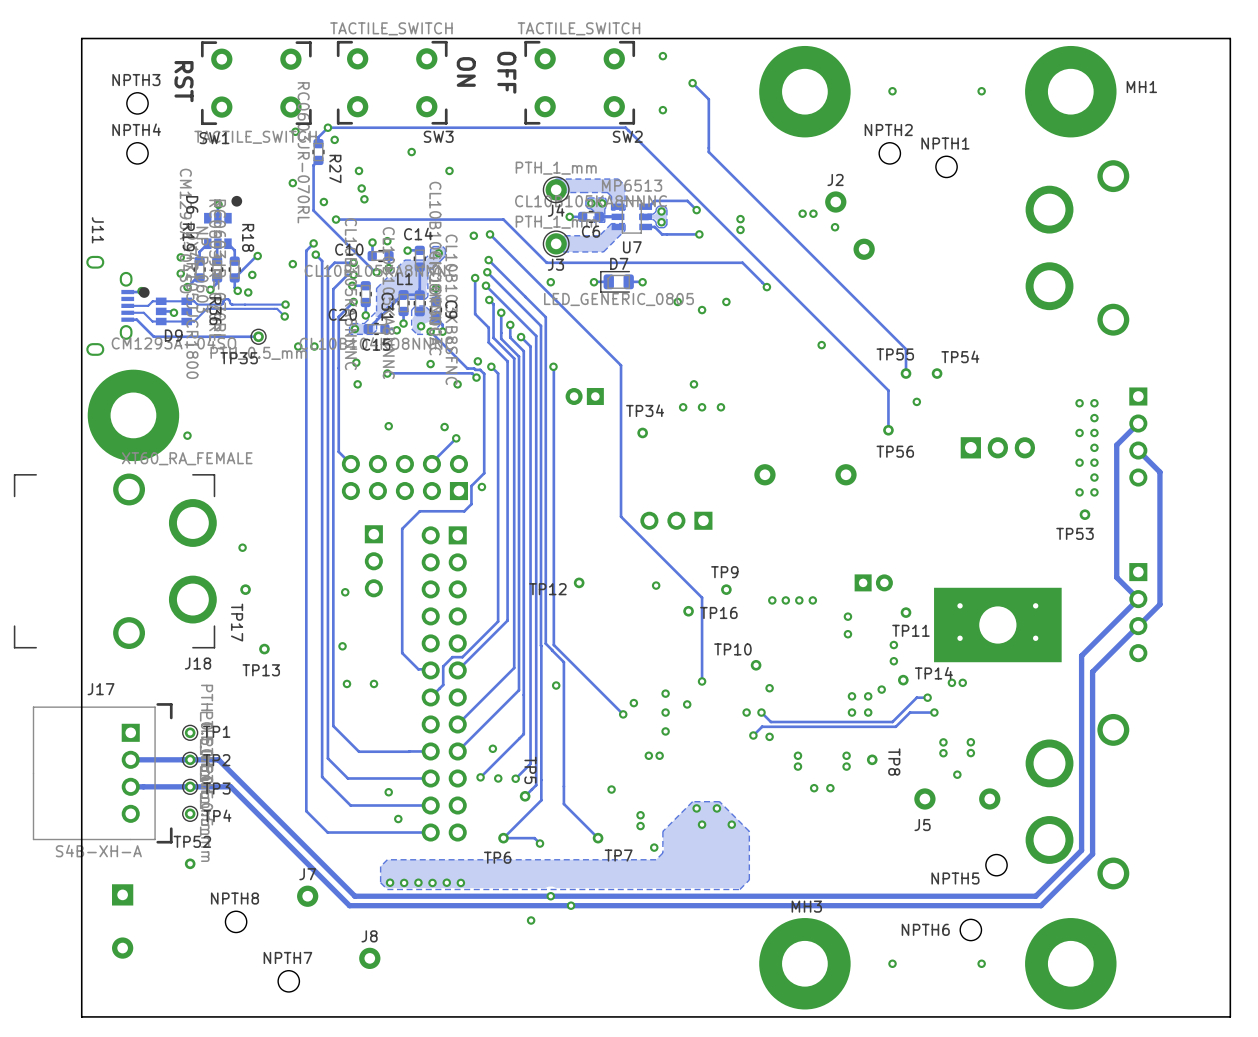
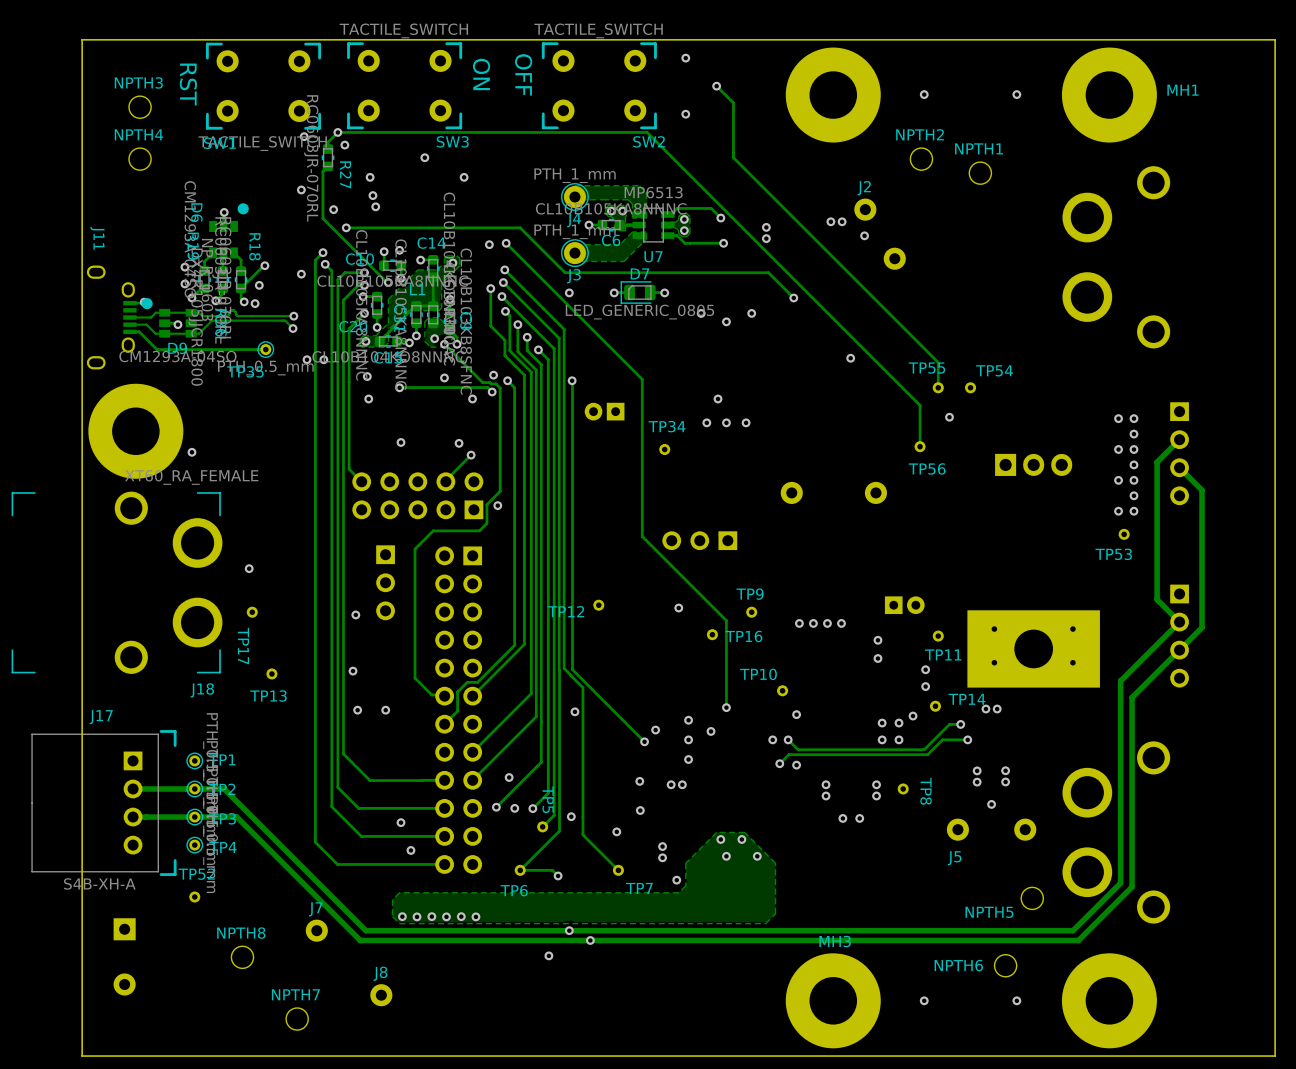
via: none -> (639, 781)
via: none -> (640, 810)
via: none -> (571, 816)
via: (611, 789) -> none
via: none -> (616, 831)

